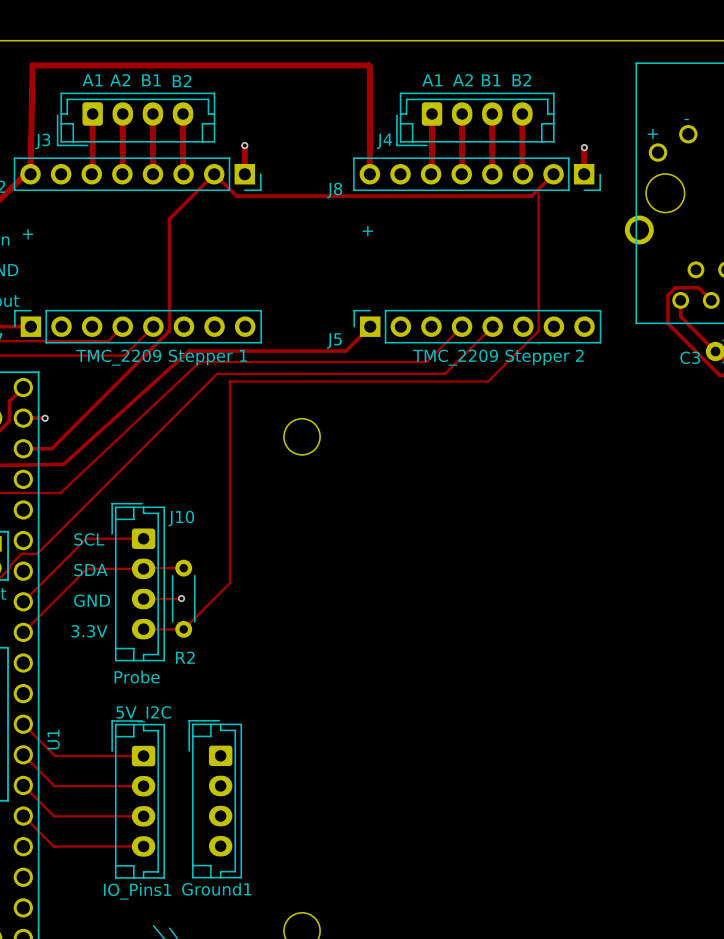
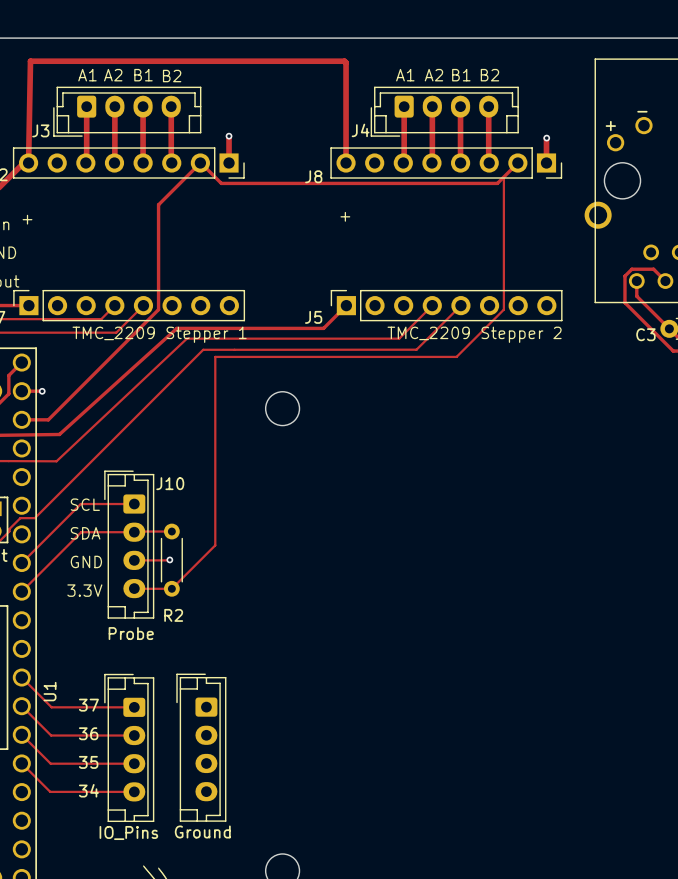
text: 5V_I2C (143, 714) -> none
text: none -> 37 (88, 705)
text: none -> 36 (88, 733)
text: none -> 35 (88, 762)
text: none -> 34 (88, 790)
Ground1 name: Ground1 (216, 889) -> Ground (202, 832)
IO_Pins1 name: IO_Pins1 (137, 891) -> IO_Pins (128, 832)

